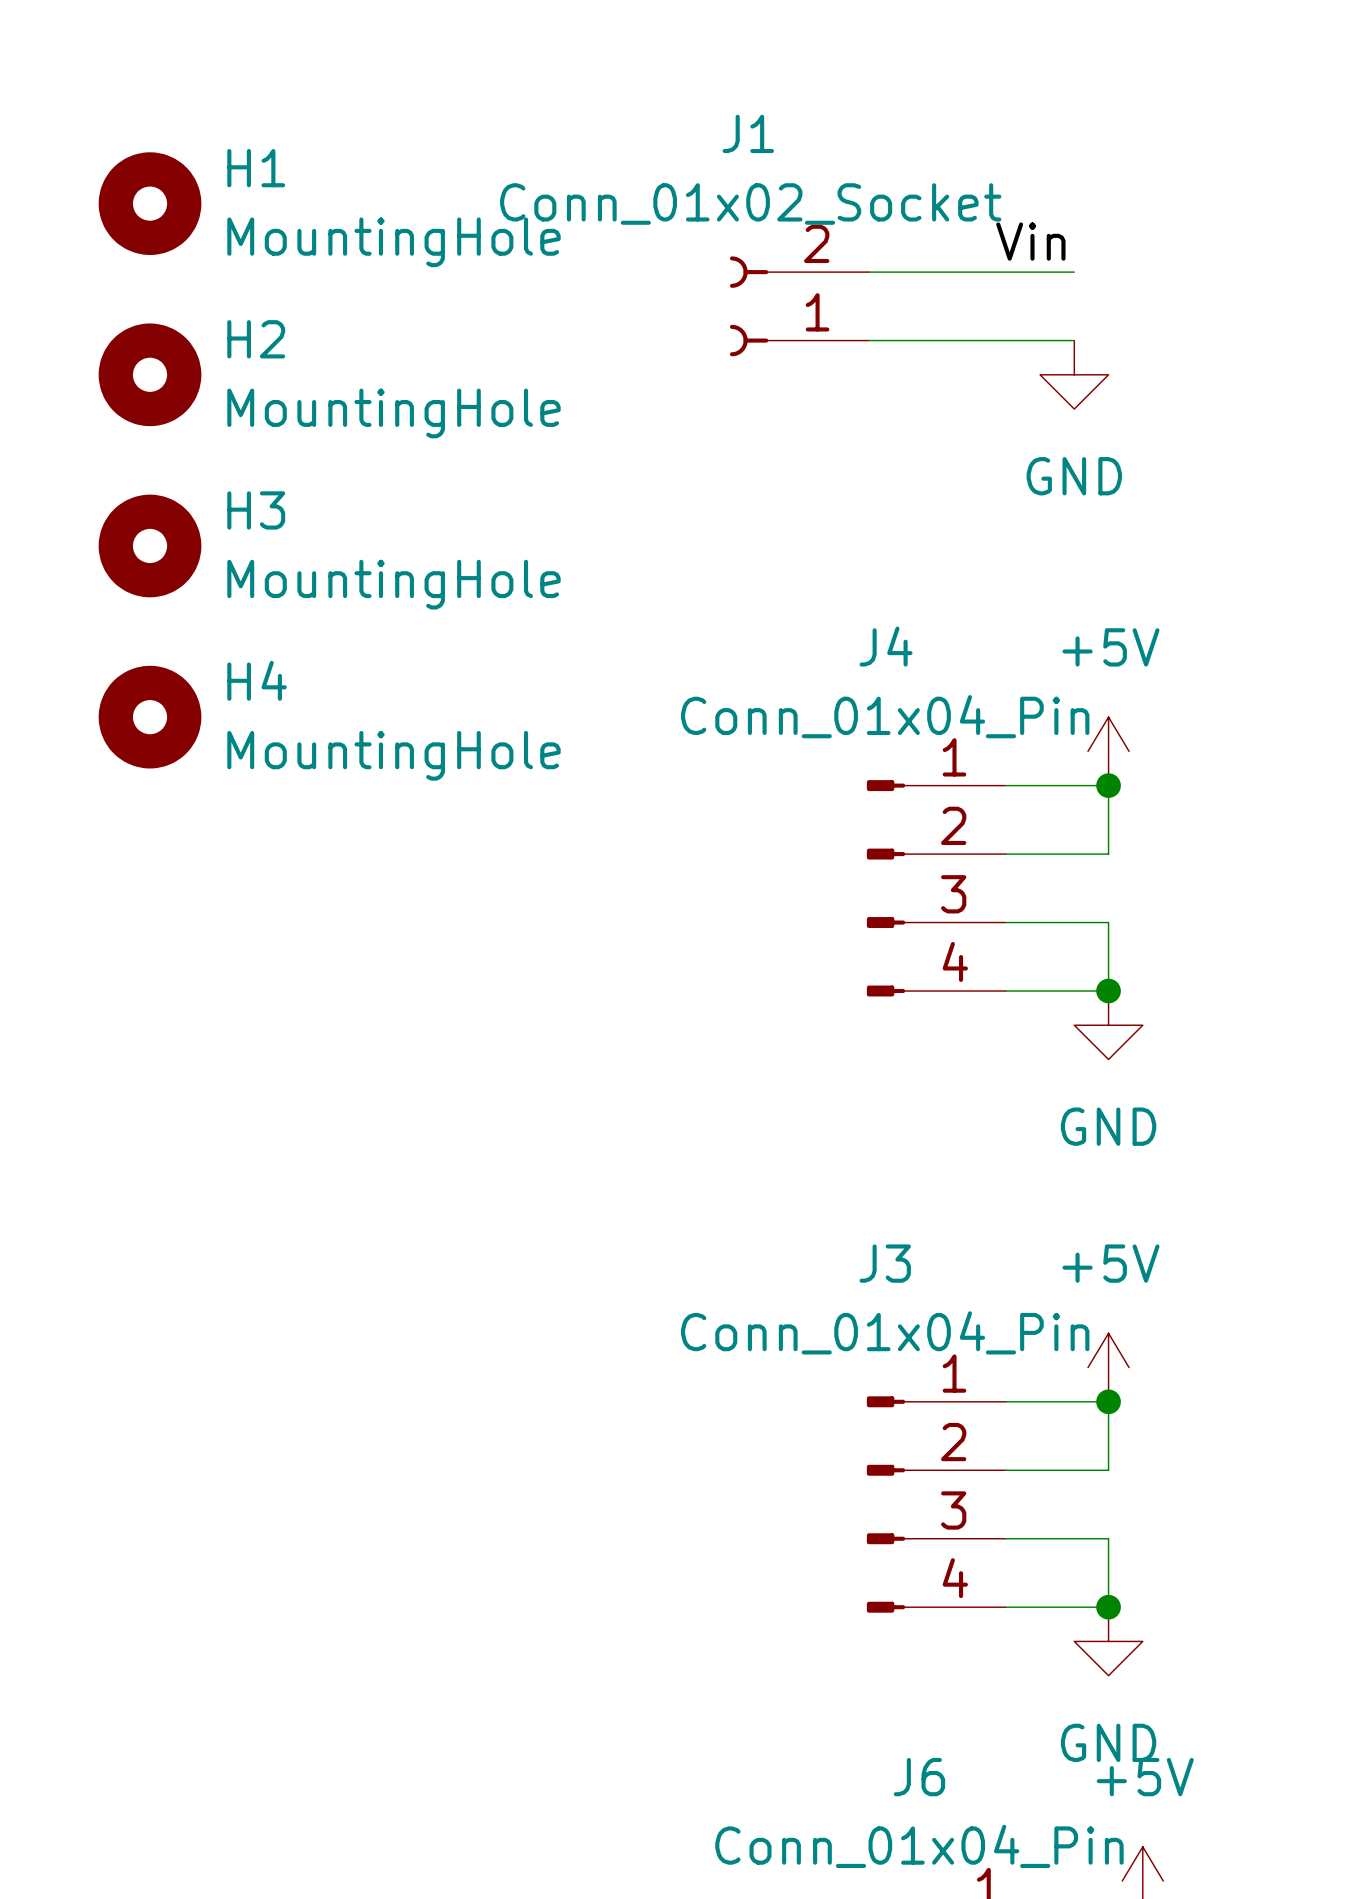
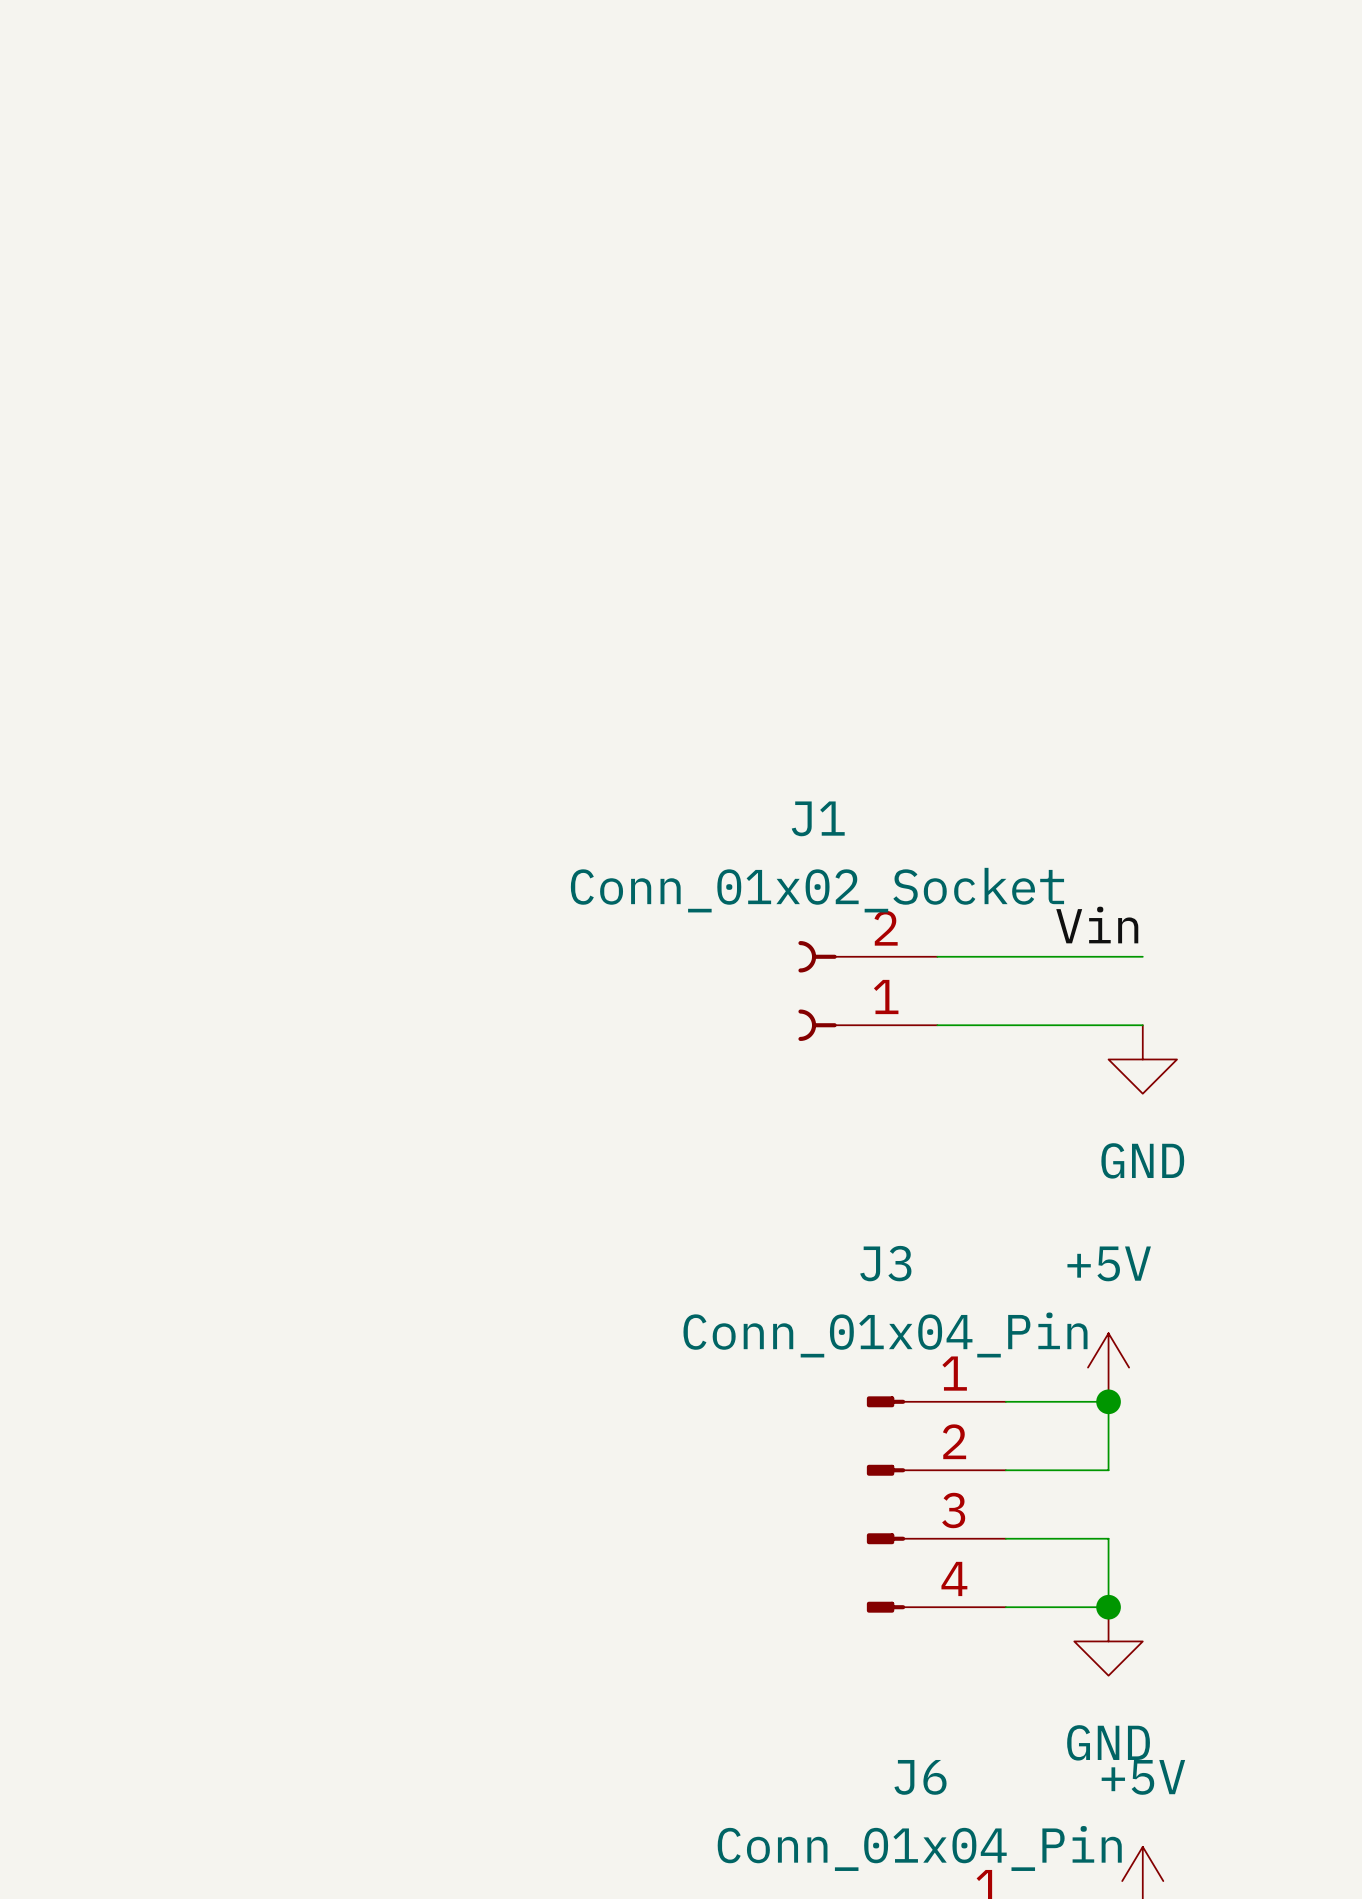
H1: MountingHole (150, 203) -> none
label: Vin (1030, 241) -> none
wire: (868, 272) (1074, 272) -> none
J1 position: (799, 306) -> (867, 991)
wire: (868, 340) (1074, 340) -> (937, 956) (1142, 956)
H2: MountingHole (150, 374) -> none
power symbol: GND (1074, 374) -> none
H3: MountingHole (150, 545) -> none
H4: MountingHole (150, 717) -> none
power symbol: +5V (1108, 751) -> none
wire: (1005, 785) (1108, 785) (1108, 854) (1005, 854) -> none
junction: (1108, 785) -> none
J4: Conn_01x04_Pin (936, 888) -> none
wire: (1005, 922) (1108, 922) (1108, 991) (1005, 991) -> none
label: none -> Vin (1097, 925)
junction: (1108, 991) -> none
wire: none -> (937, 1025) (1142, 1025)
power symbol position: GND (1108, 1025) -> GND (1142, 1059)

